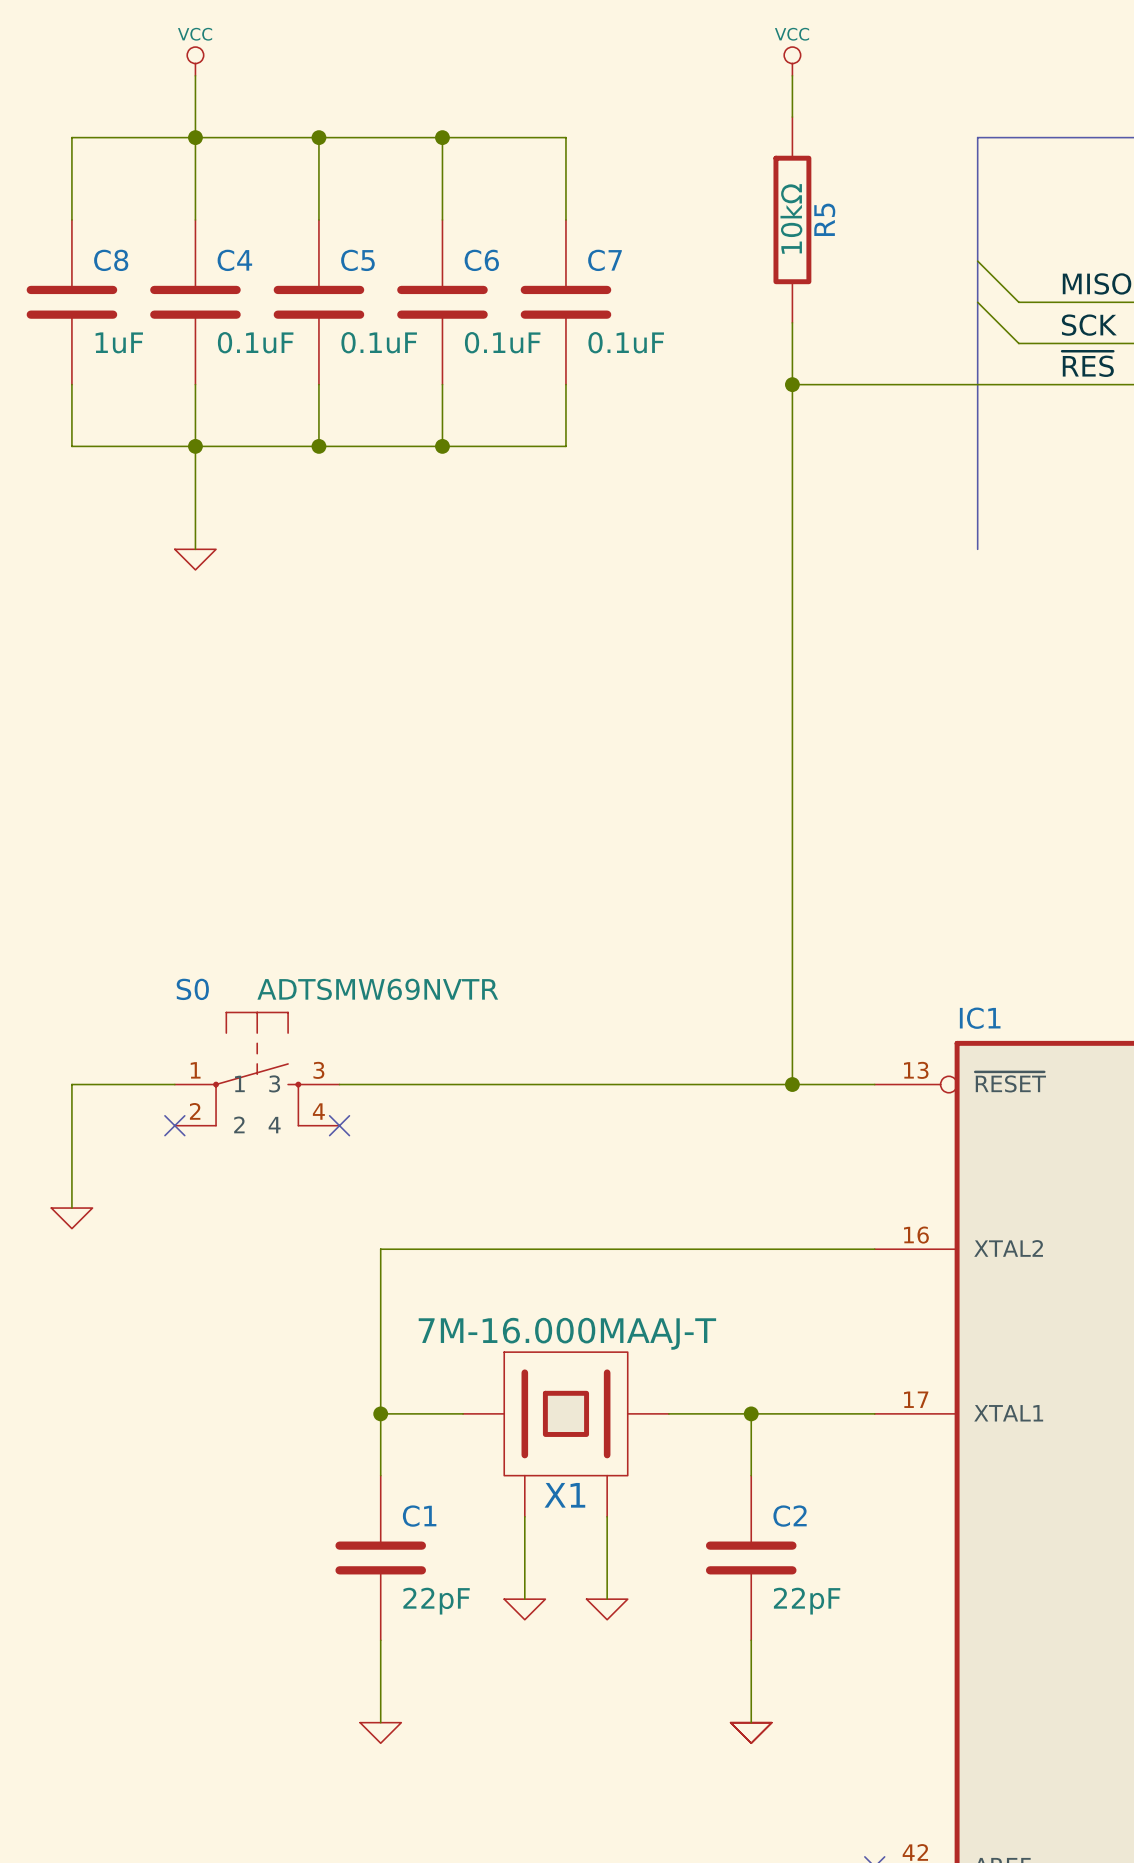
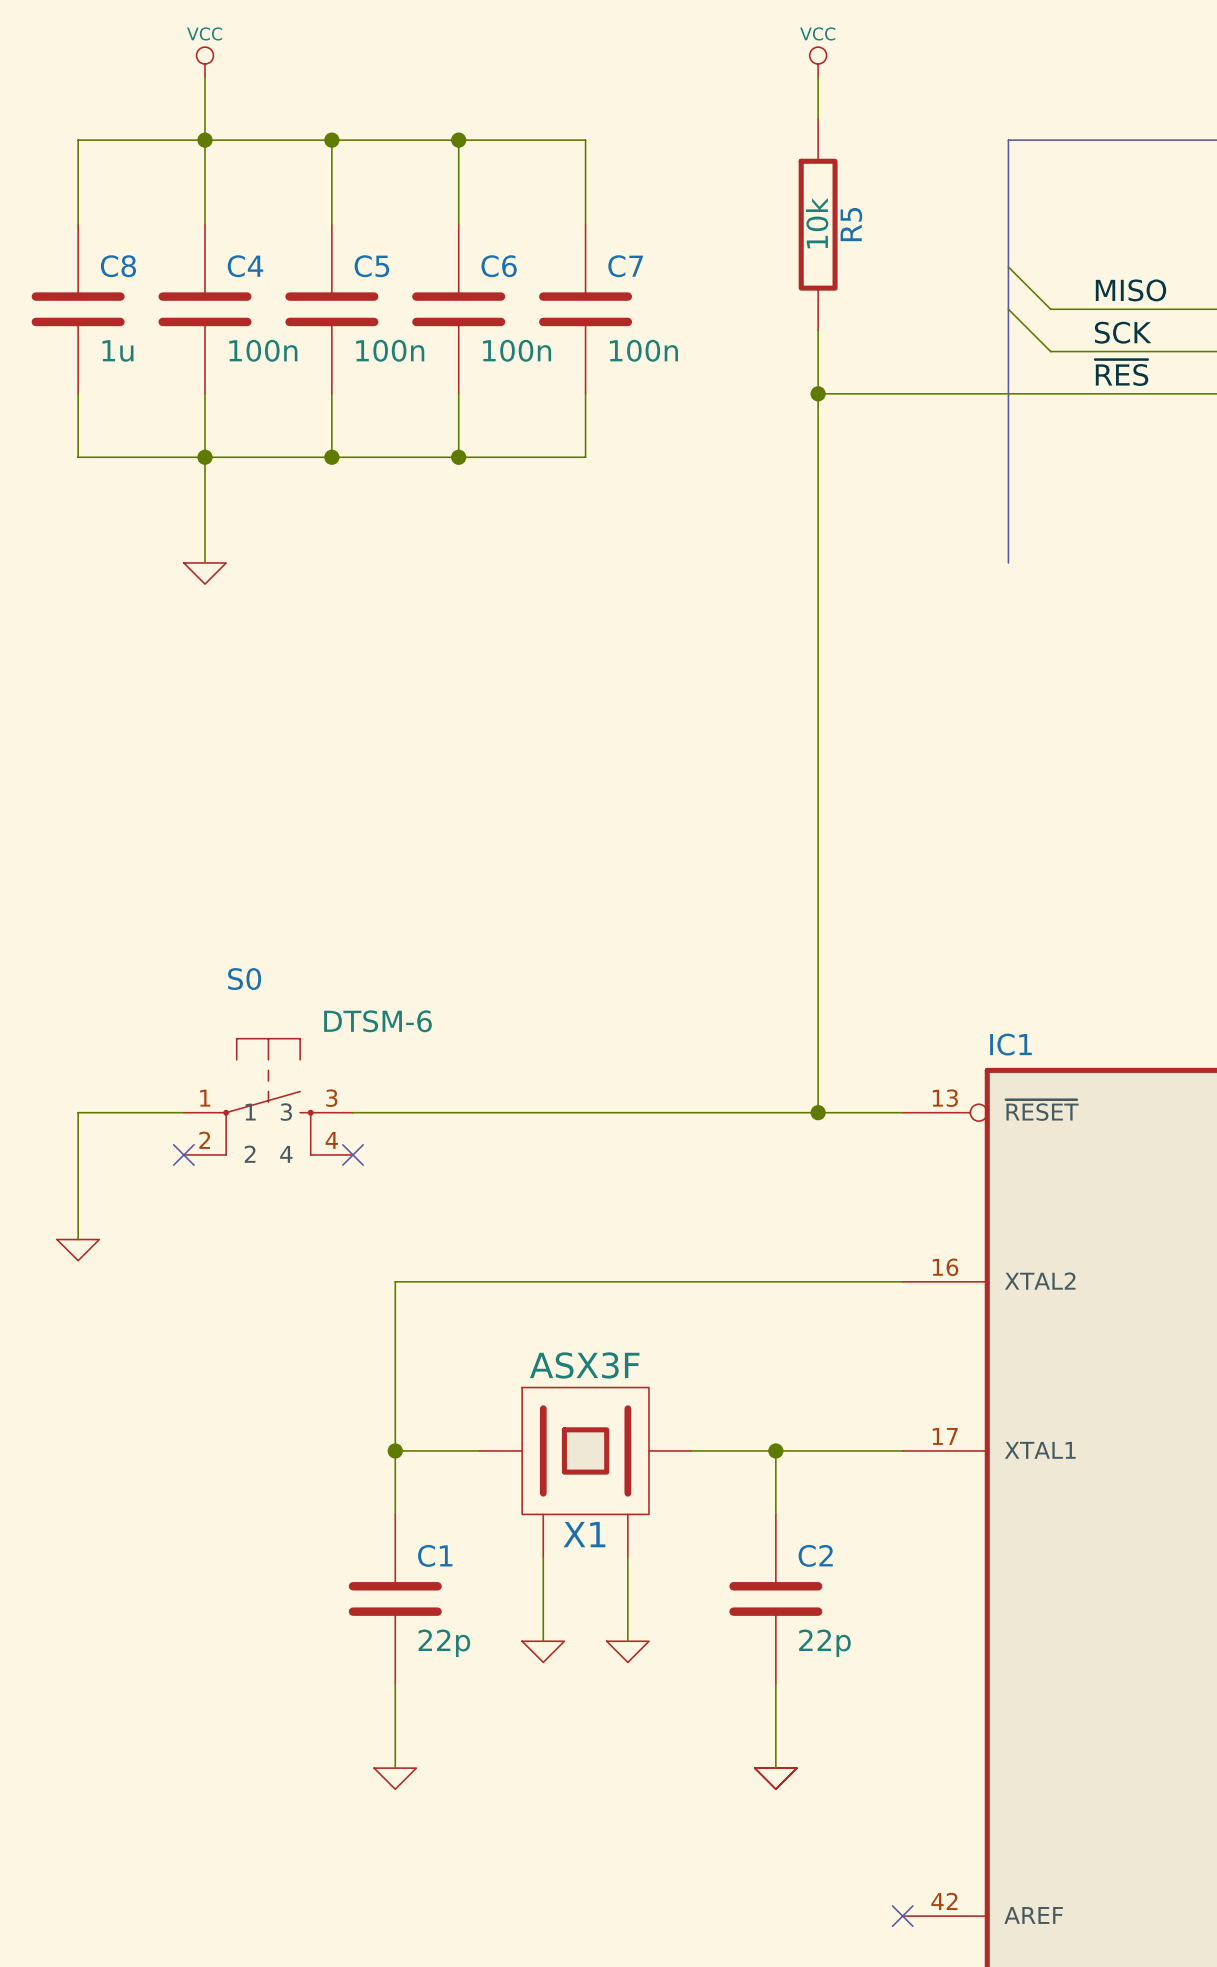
R5 value: 10kΩ (791, 218) -> 10k (817, 223)
C8 value: 1uF (119, 342) -> 1u (117, 350)
C4 value: 0.1uF (255, 342) -> 100n (263, 350)
C5 value: 0.1uF (379, 342) -> 100n (390, 350)
C6 value: 0.1uF (502, 342) -> 100n (517, 350)
C7 value: 0.1uF (626, 342) -> 100n (643, 350)
S0 name position: S0 (192, 989) -> S0 (244, 979)
S0 value: ADTSMW69NVTR (377, 989) -> DTSM-6 (377, 1021)
X1 value: 7M-16.000MAAJ-T (567, 1333) -> ASX3F (584, 1365)
C1 value: 22pF (436, 1601) -> 22p (444, 1643)
C2 value: 22pF (807, 1601) -> 22p (824, 1643)

